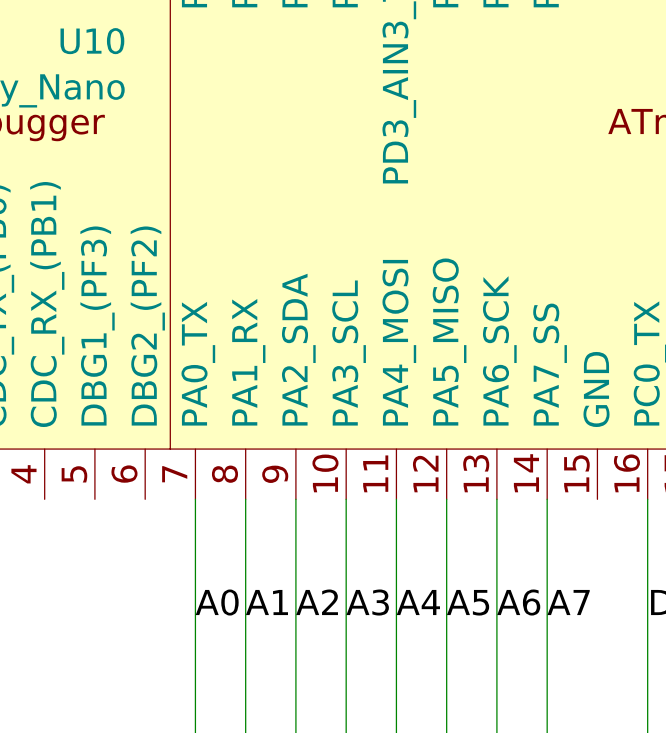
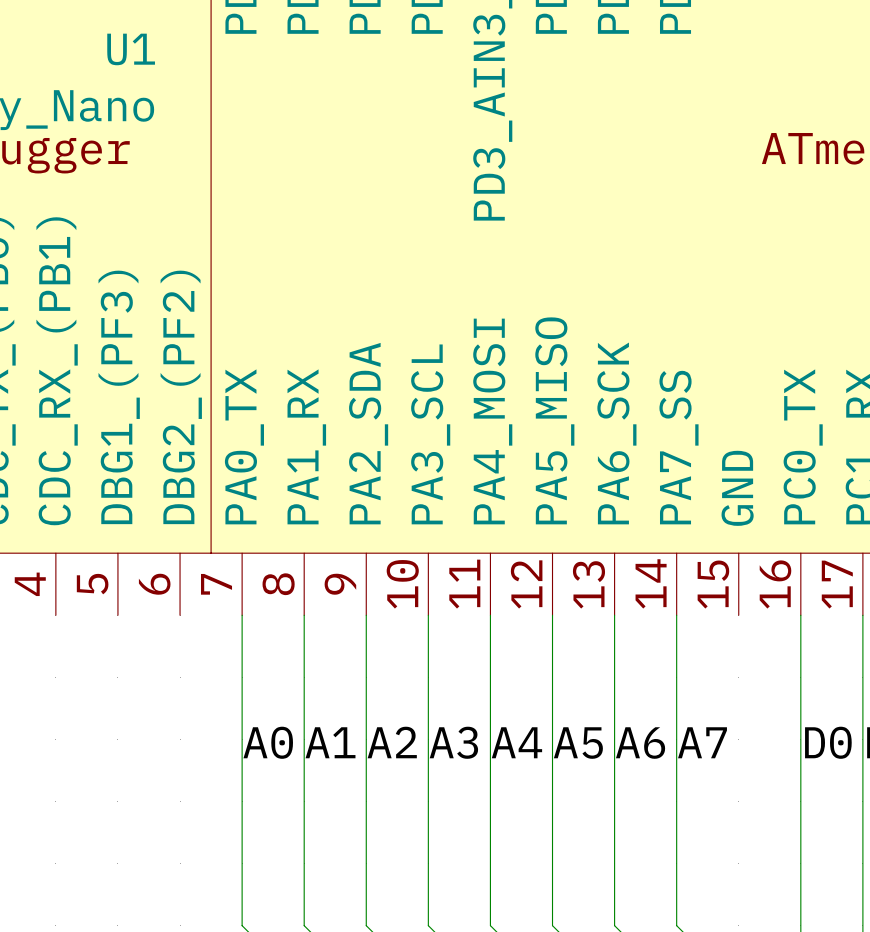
U10 name: U10 (92, 41) -> U1 (131, 49)

